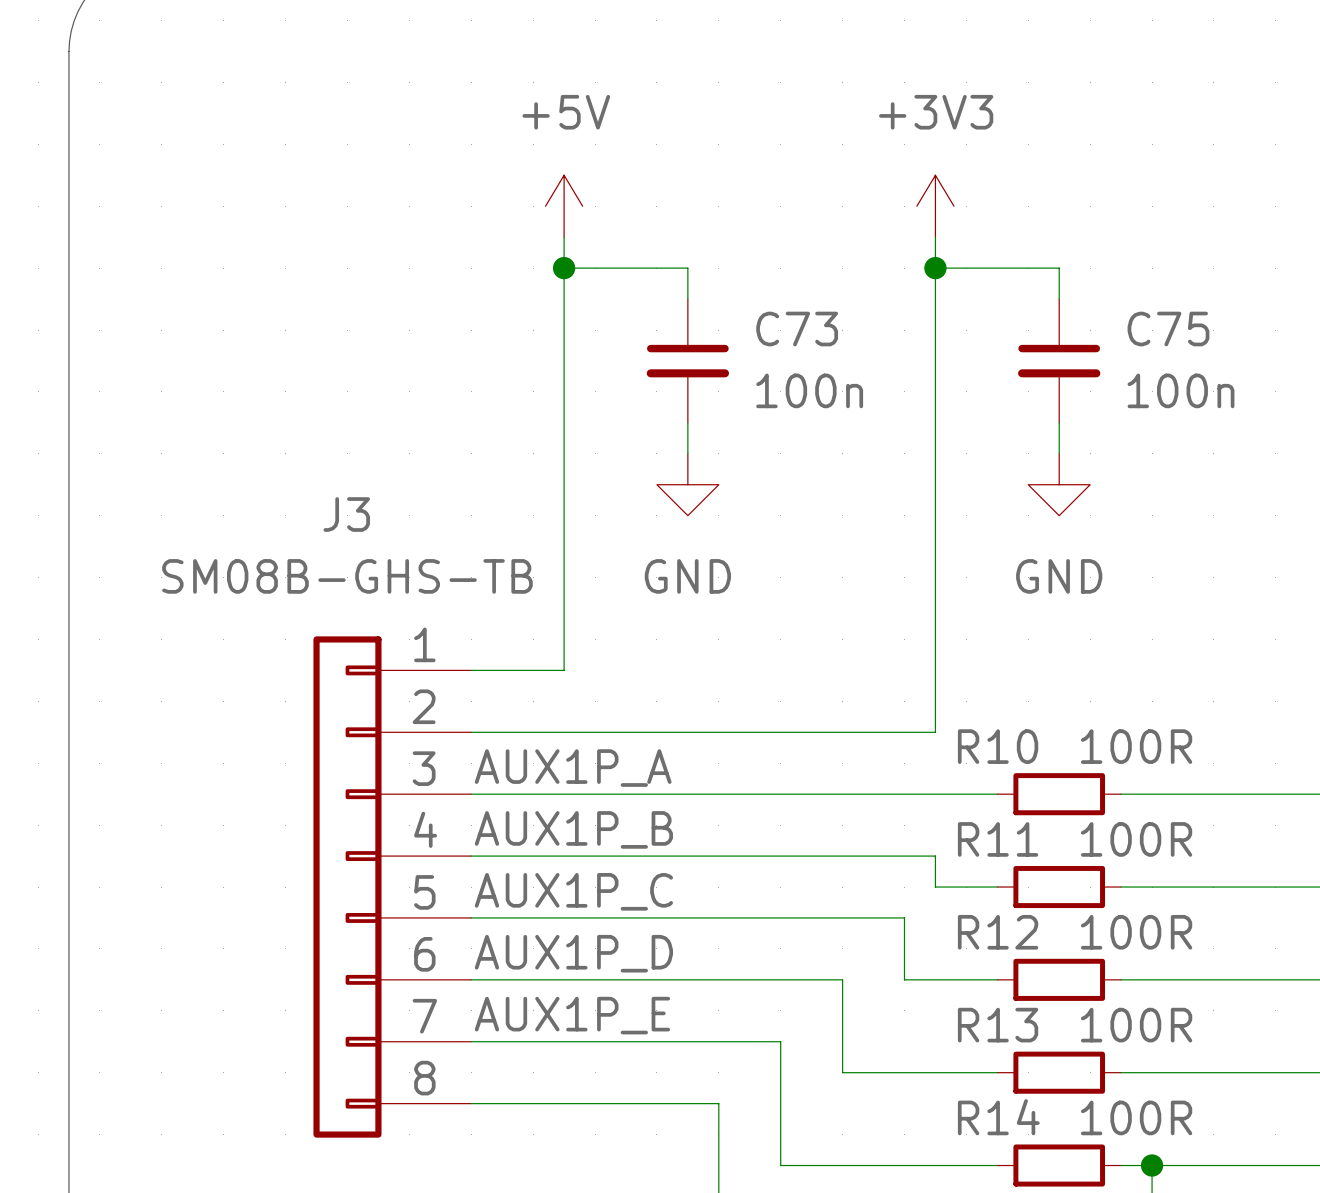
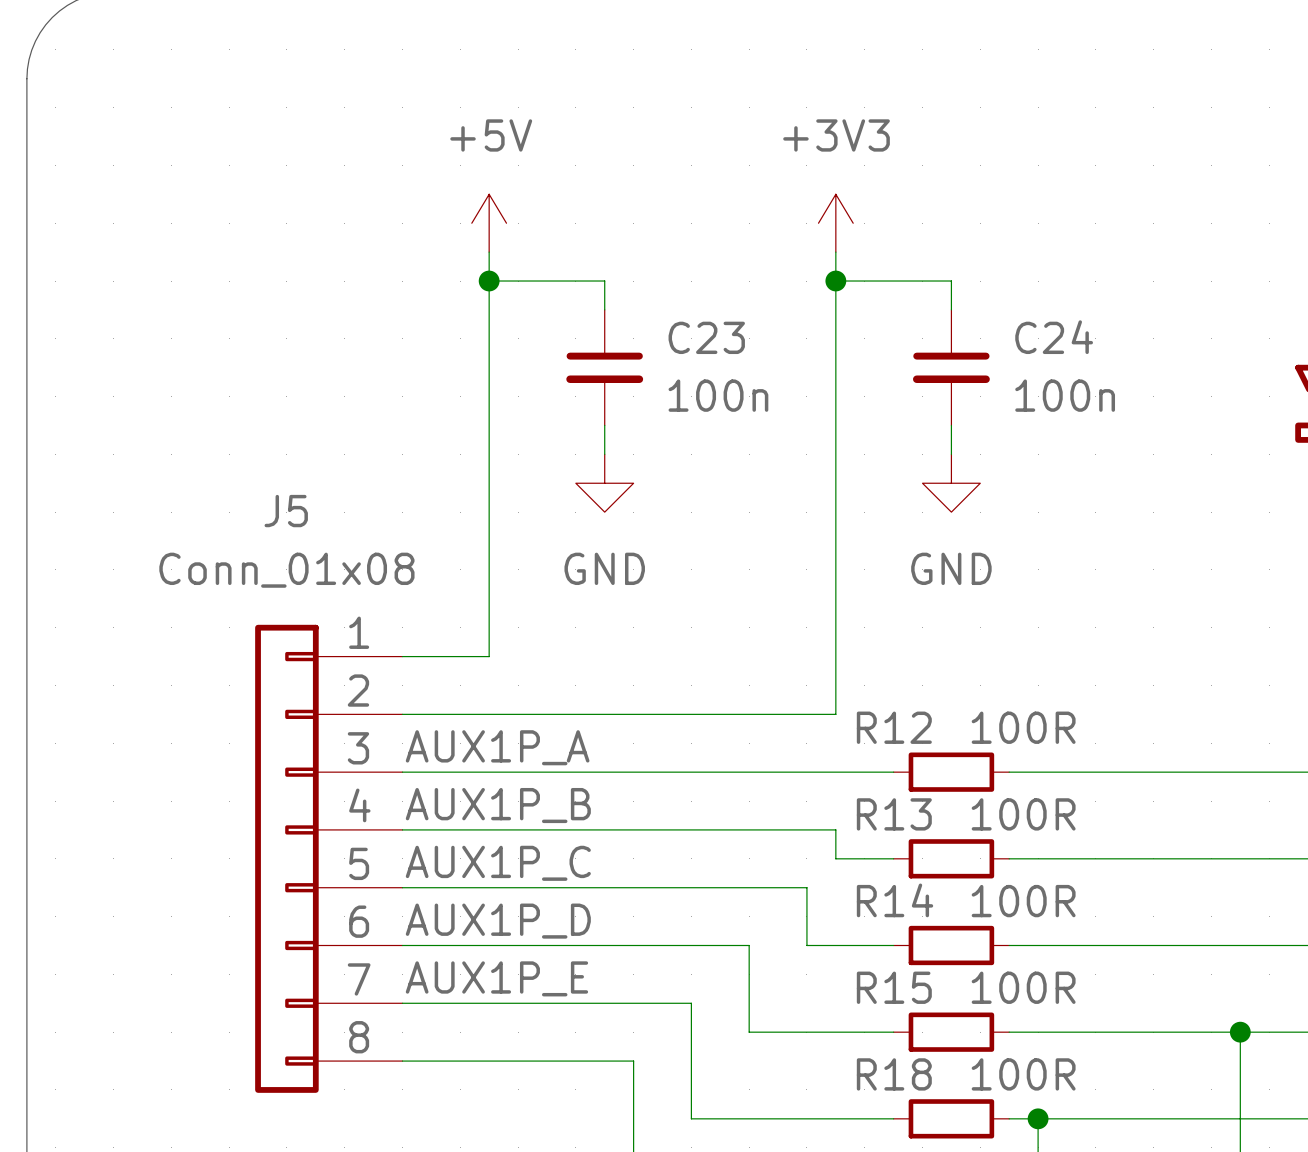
C73 name: C73 (797, 329) -> C23 (706, 337)
C75 name: C75 (1168, 329) -> C24 (1054, 337)
J3 name: J3 (346, 514) -> J5 (286, 511)
J3 value: SM08B-GHS-TB (347, 576) -> Conn_01x08 (286, 570)
R10 name: R10 (998, 746) -> R12 (894, 727)
R11 name: R11 (998, 839) -> R13 (894, 814)
R12 name: R12 (998, 932) -> R14 (895, 900)
R13 name: R13 (998, 1025) -> R15 (894, 987)
R14 name: R14 (998, 1117) -> R18 (894, 1074)

